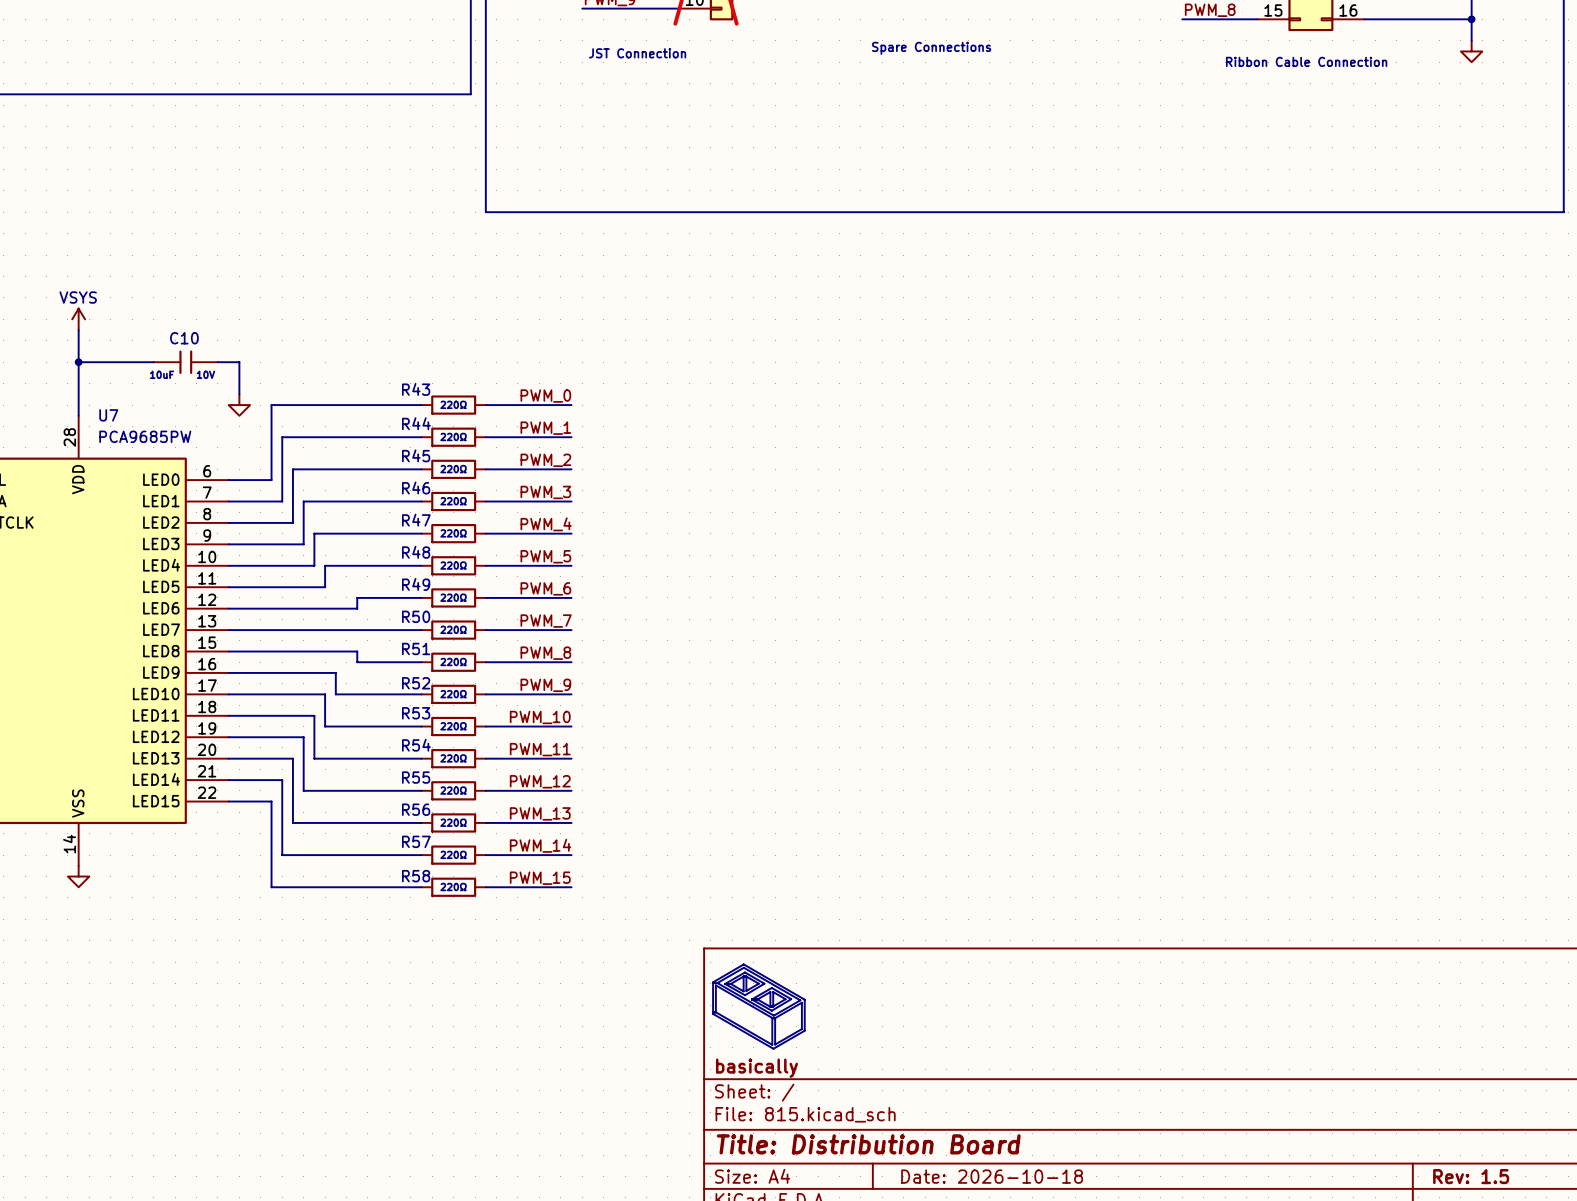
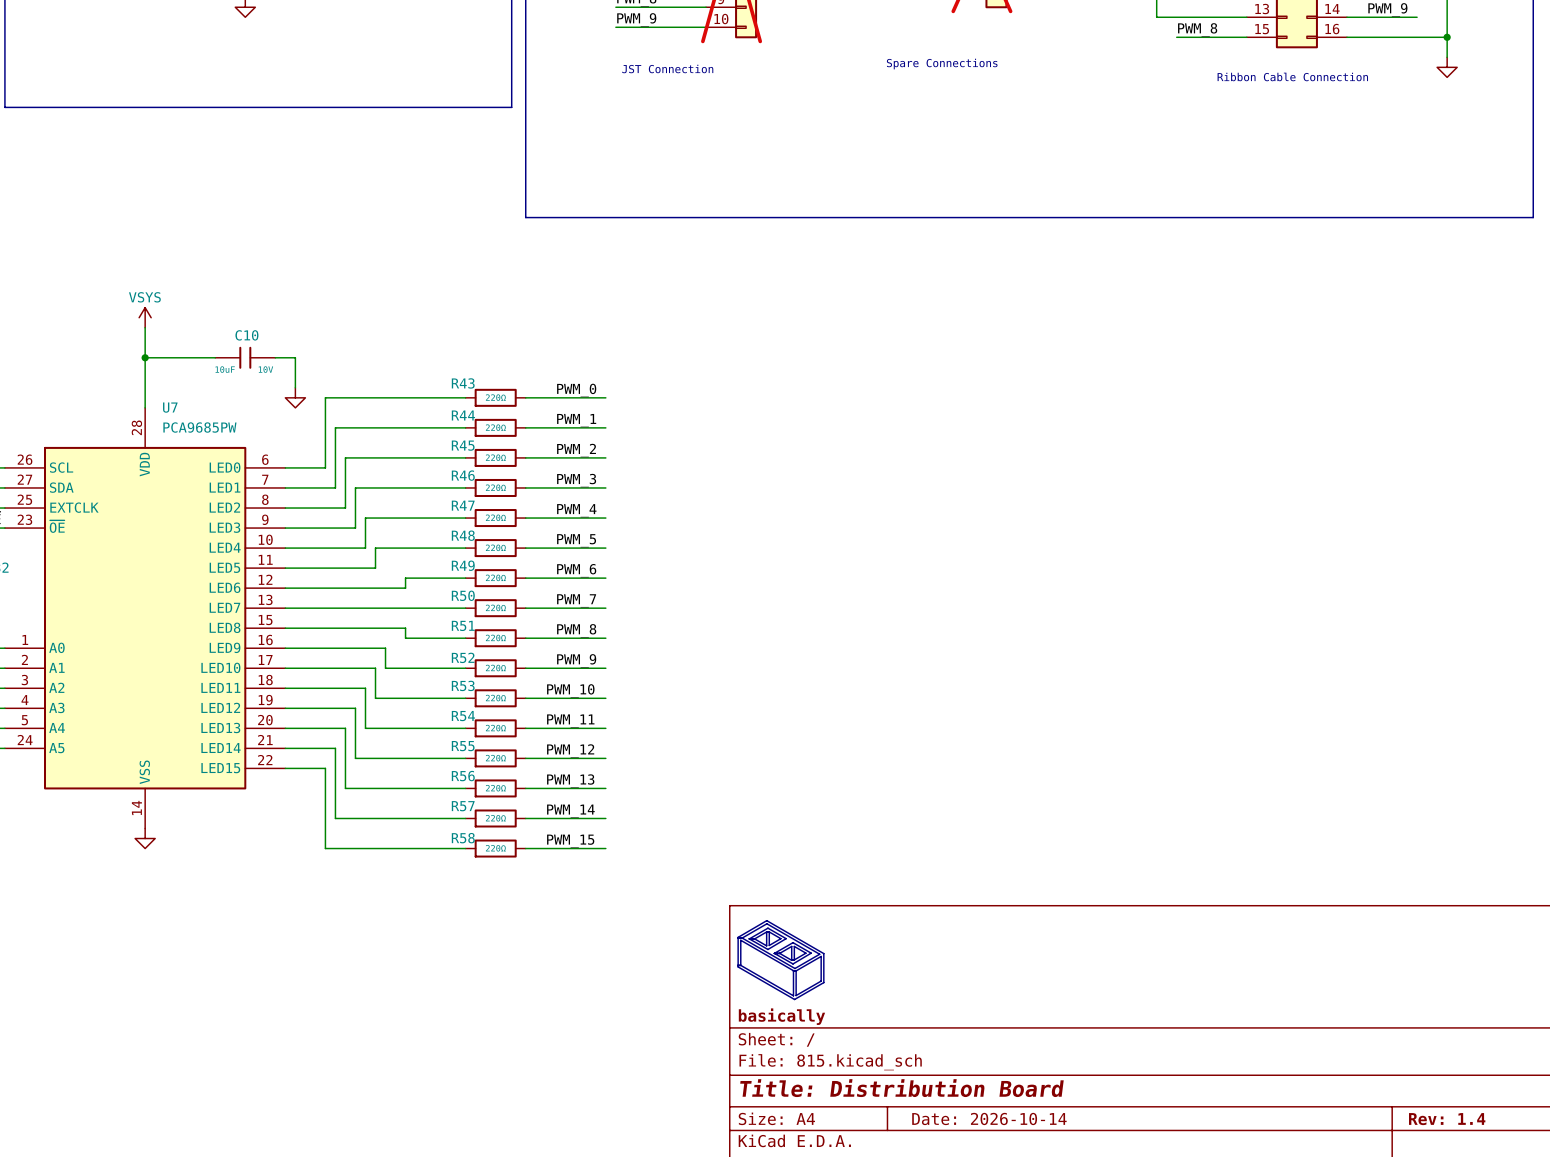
title block: Date: 2026-10-18 (992, 1176) -> Date: 2026-10-14 (989, 1118)
title block: Rev: 1.5 (1471, 1176) -> Rev: 1.4 (1447, 1119)

